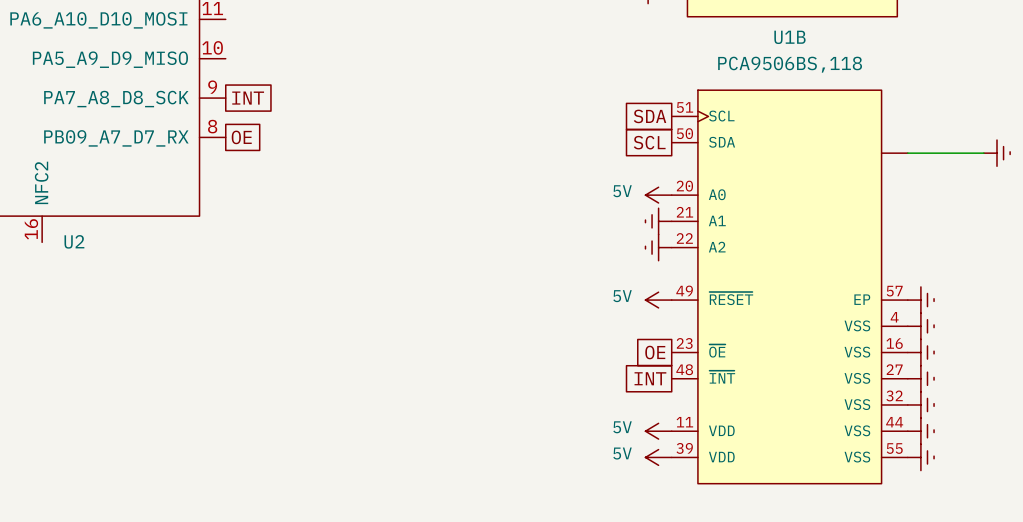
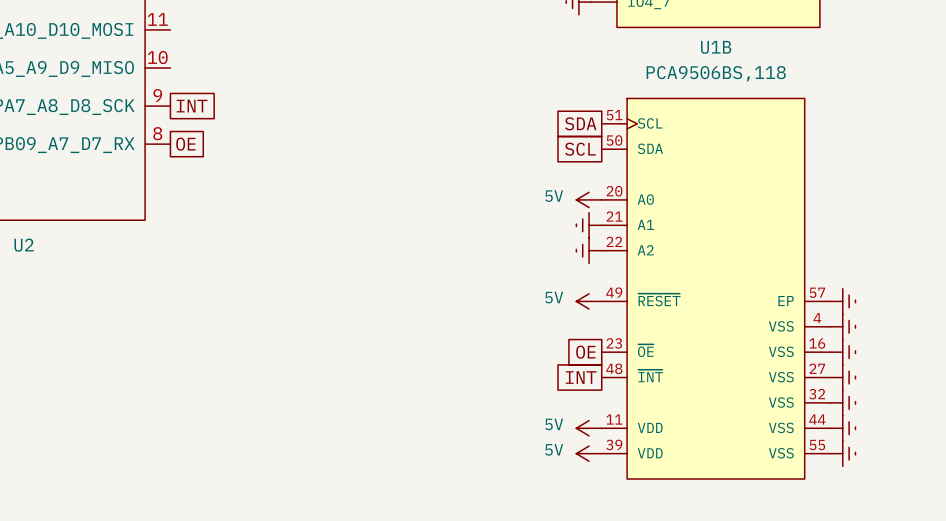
U1B symbol: [671, 90, 908, 484] -> [601, 98, 831, 480]
wire: (907, 153) (983, 153) -> none
power symbol: (996, 153) -> none

